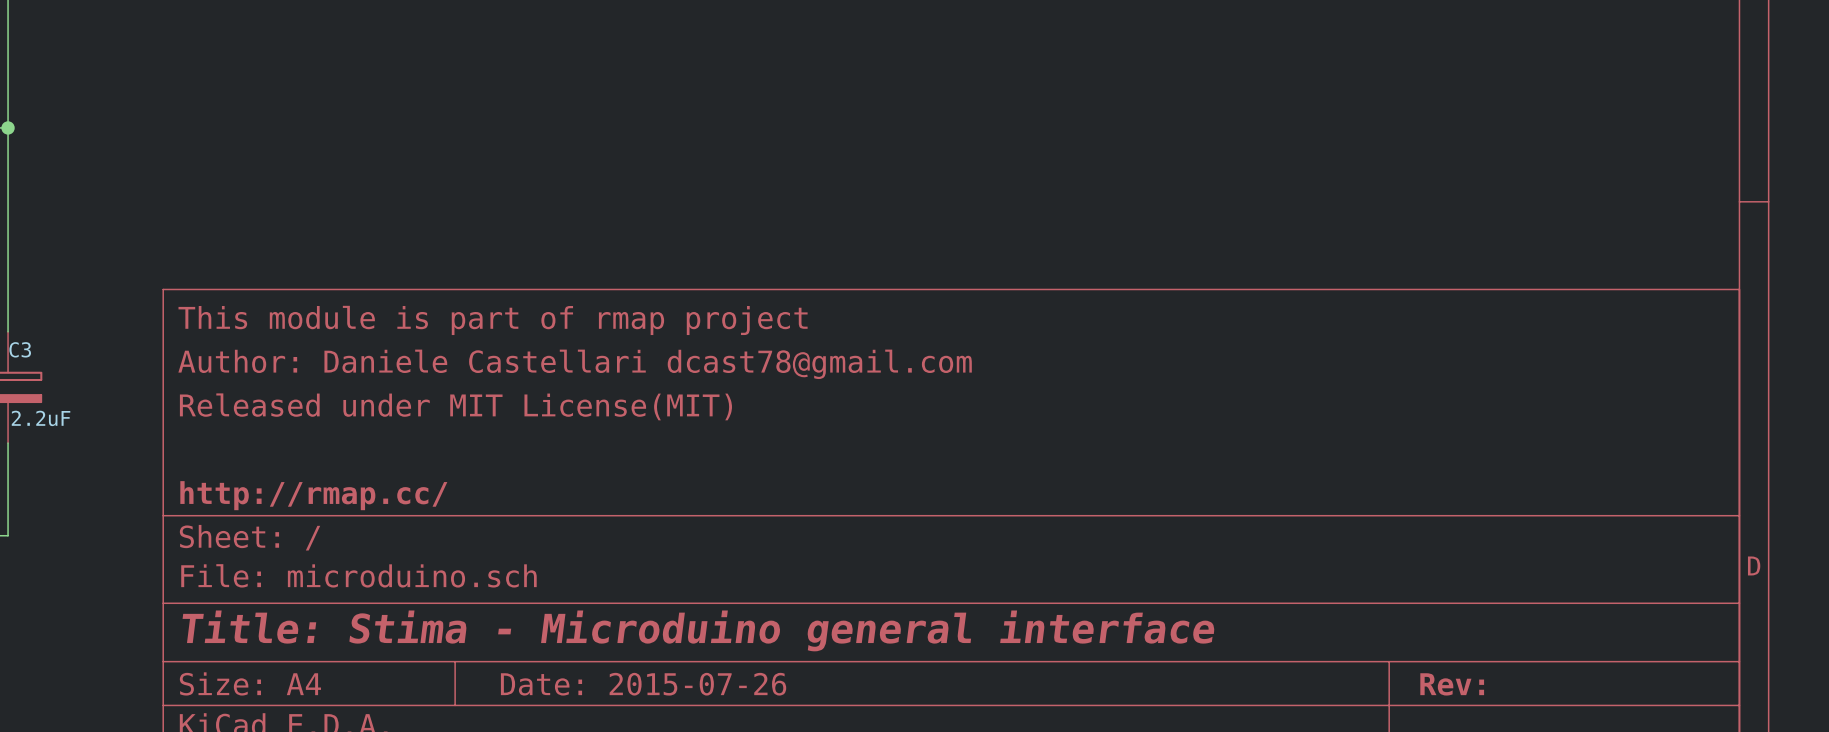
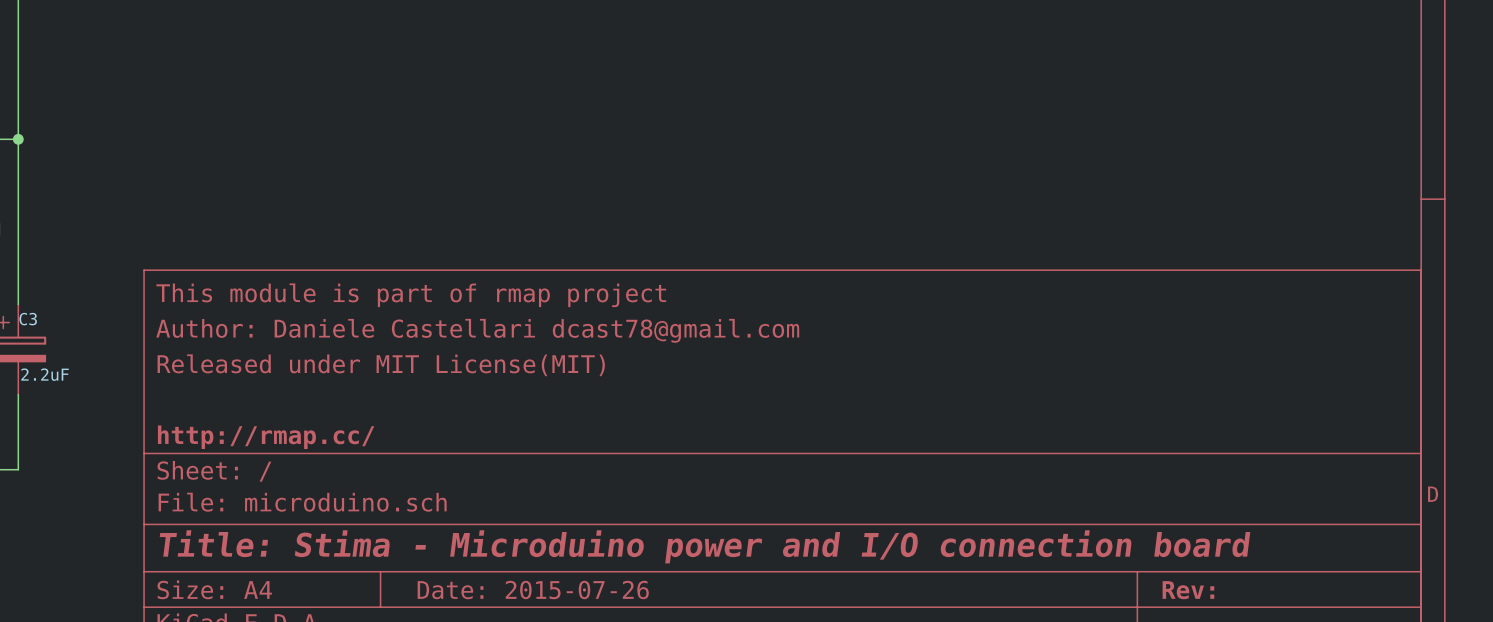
title block: Title: Stima - Microduino general interface (698, 630) -> Title: Stima - Microduino power and I/O connection board (705, 546)

